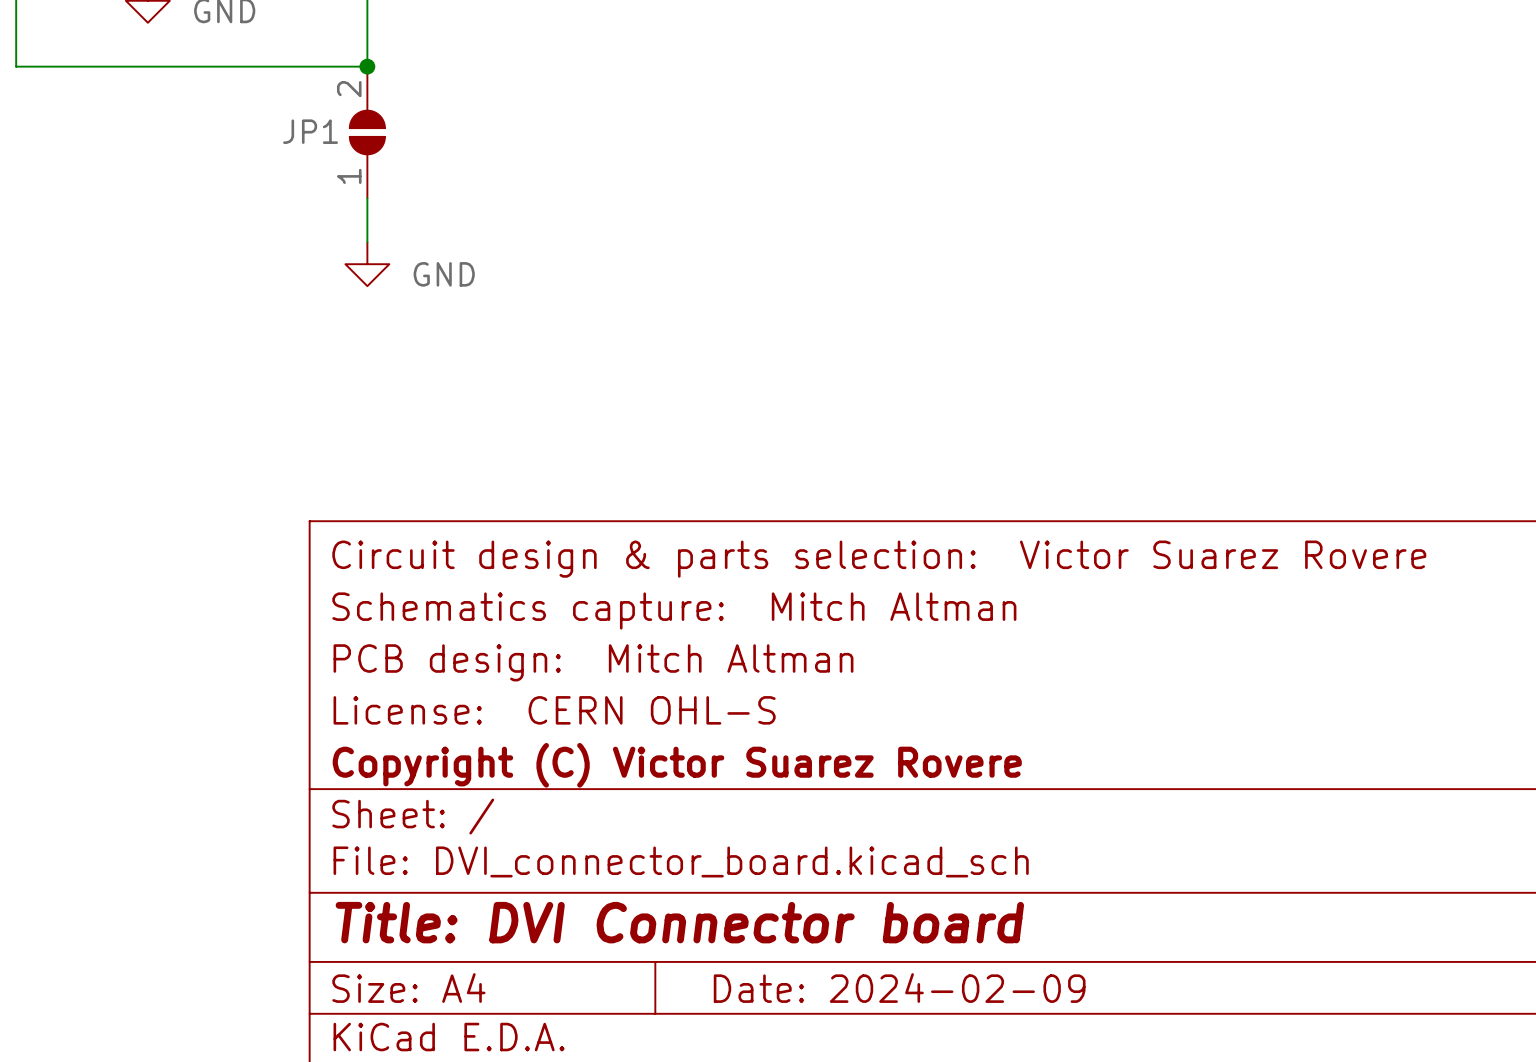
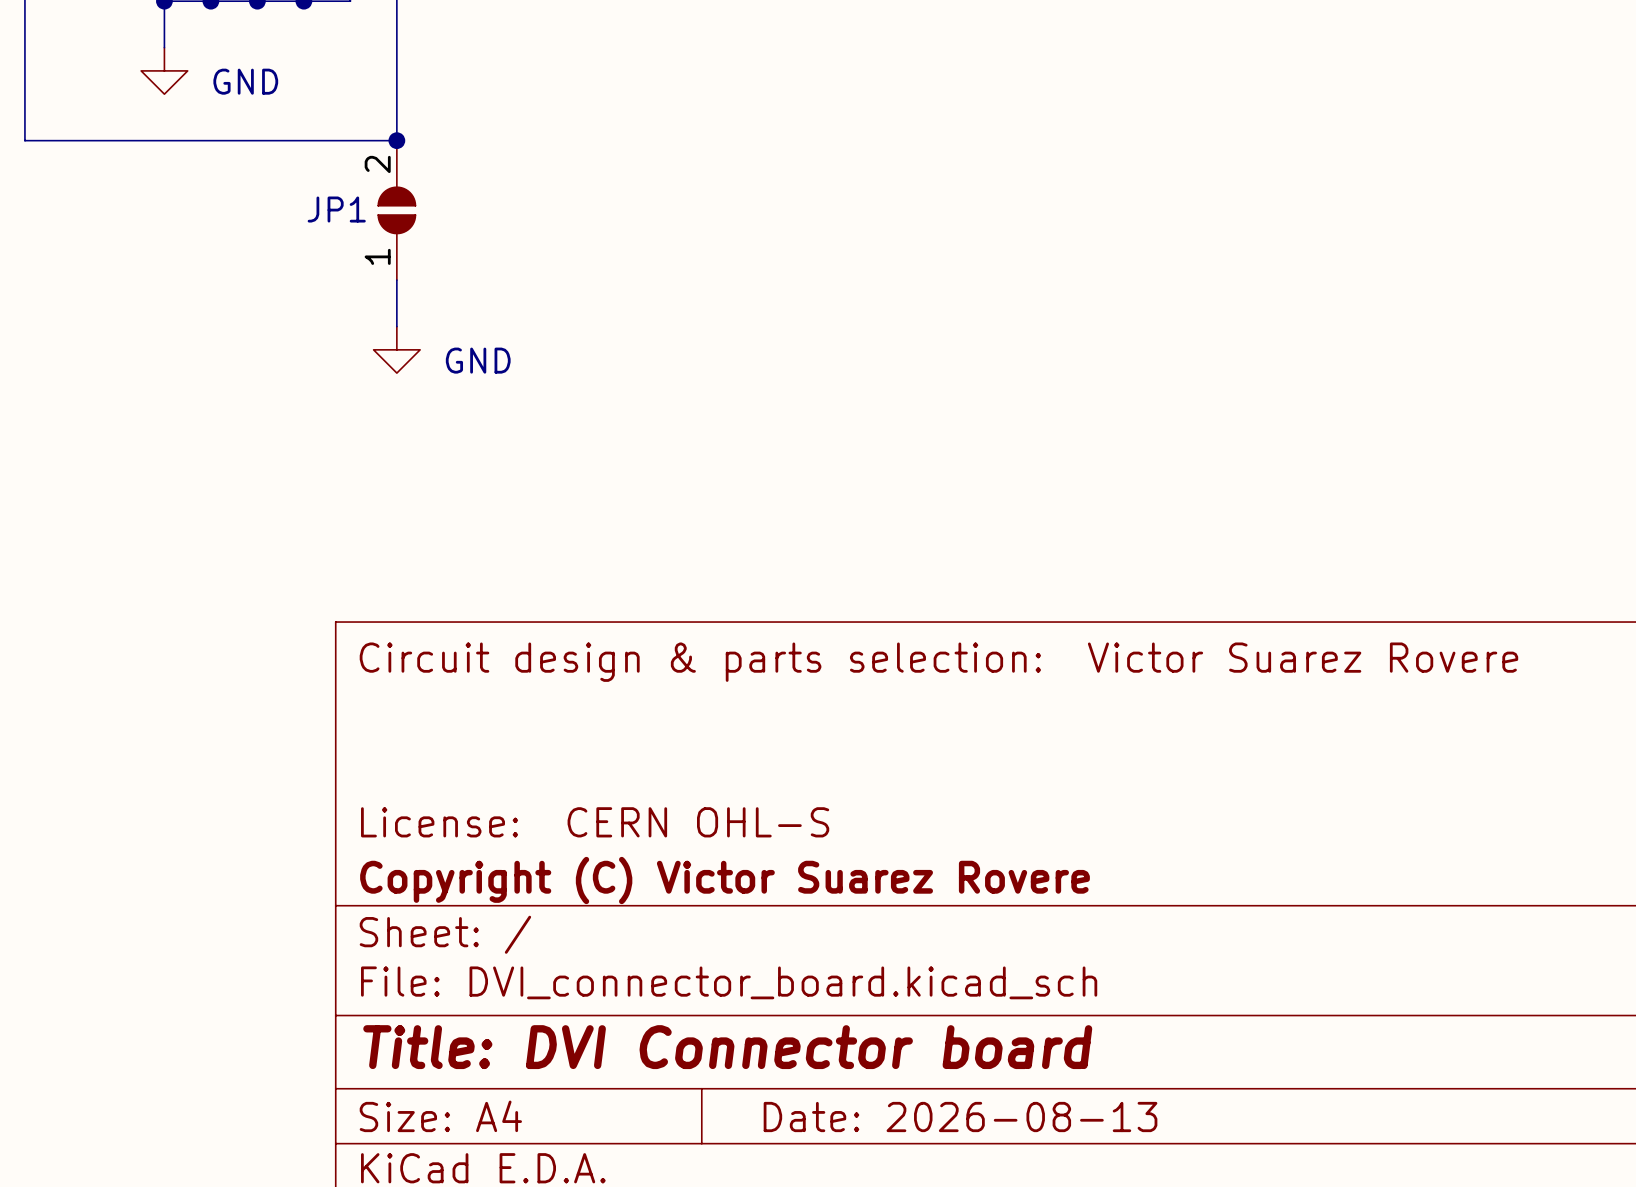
title block: Schematics capture: Mitch Altman (674, 610) -> none
title block: PCB design: Mitch Altman (593, 662) -> none
title block: Date: 2024-02-09 (899, 988) -> Date: 2026-08-13 (960, 1117)

